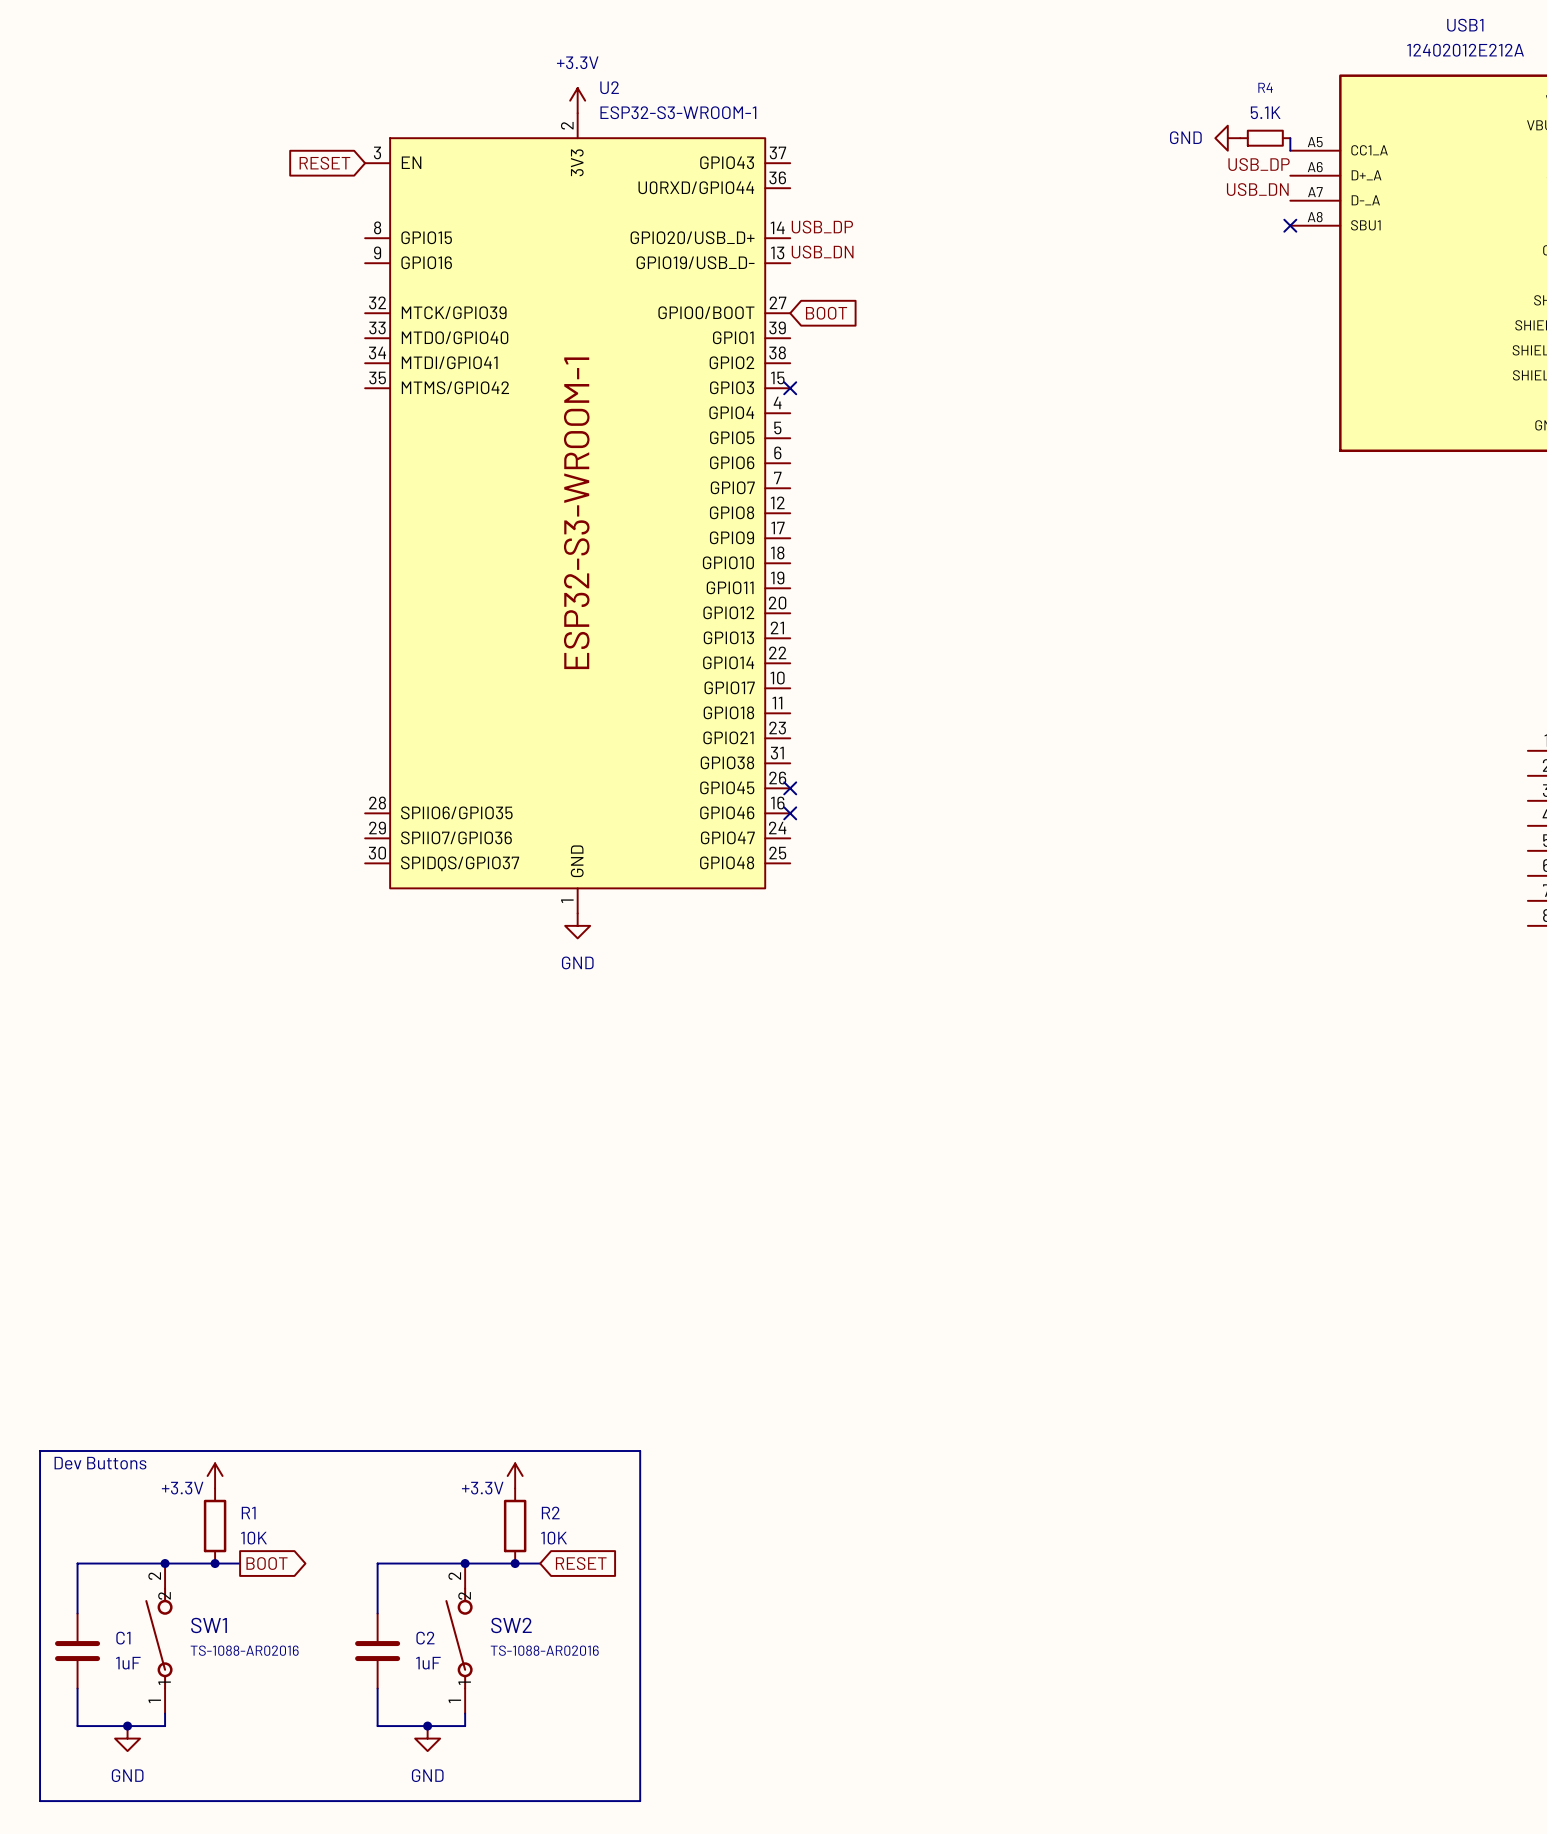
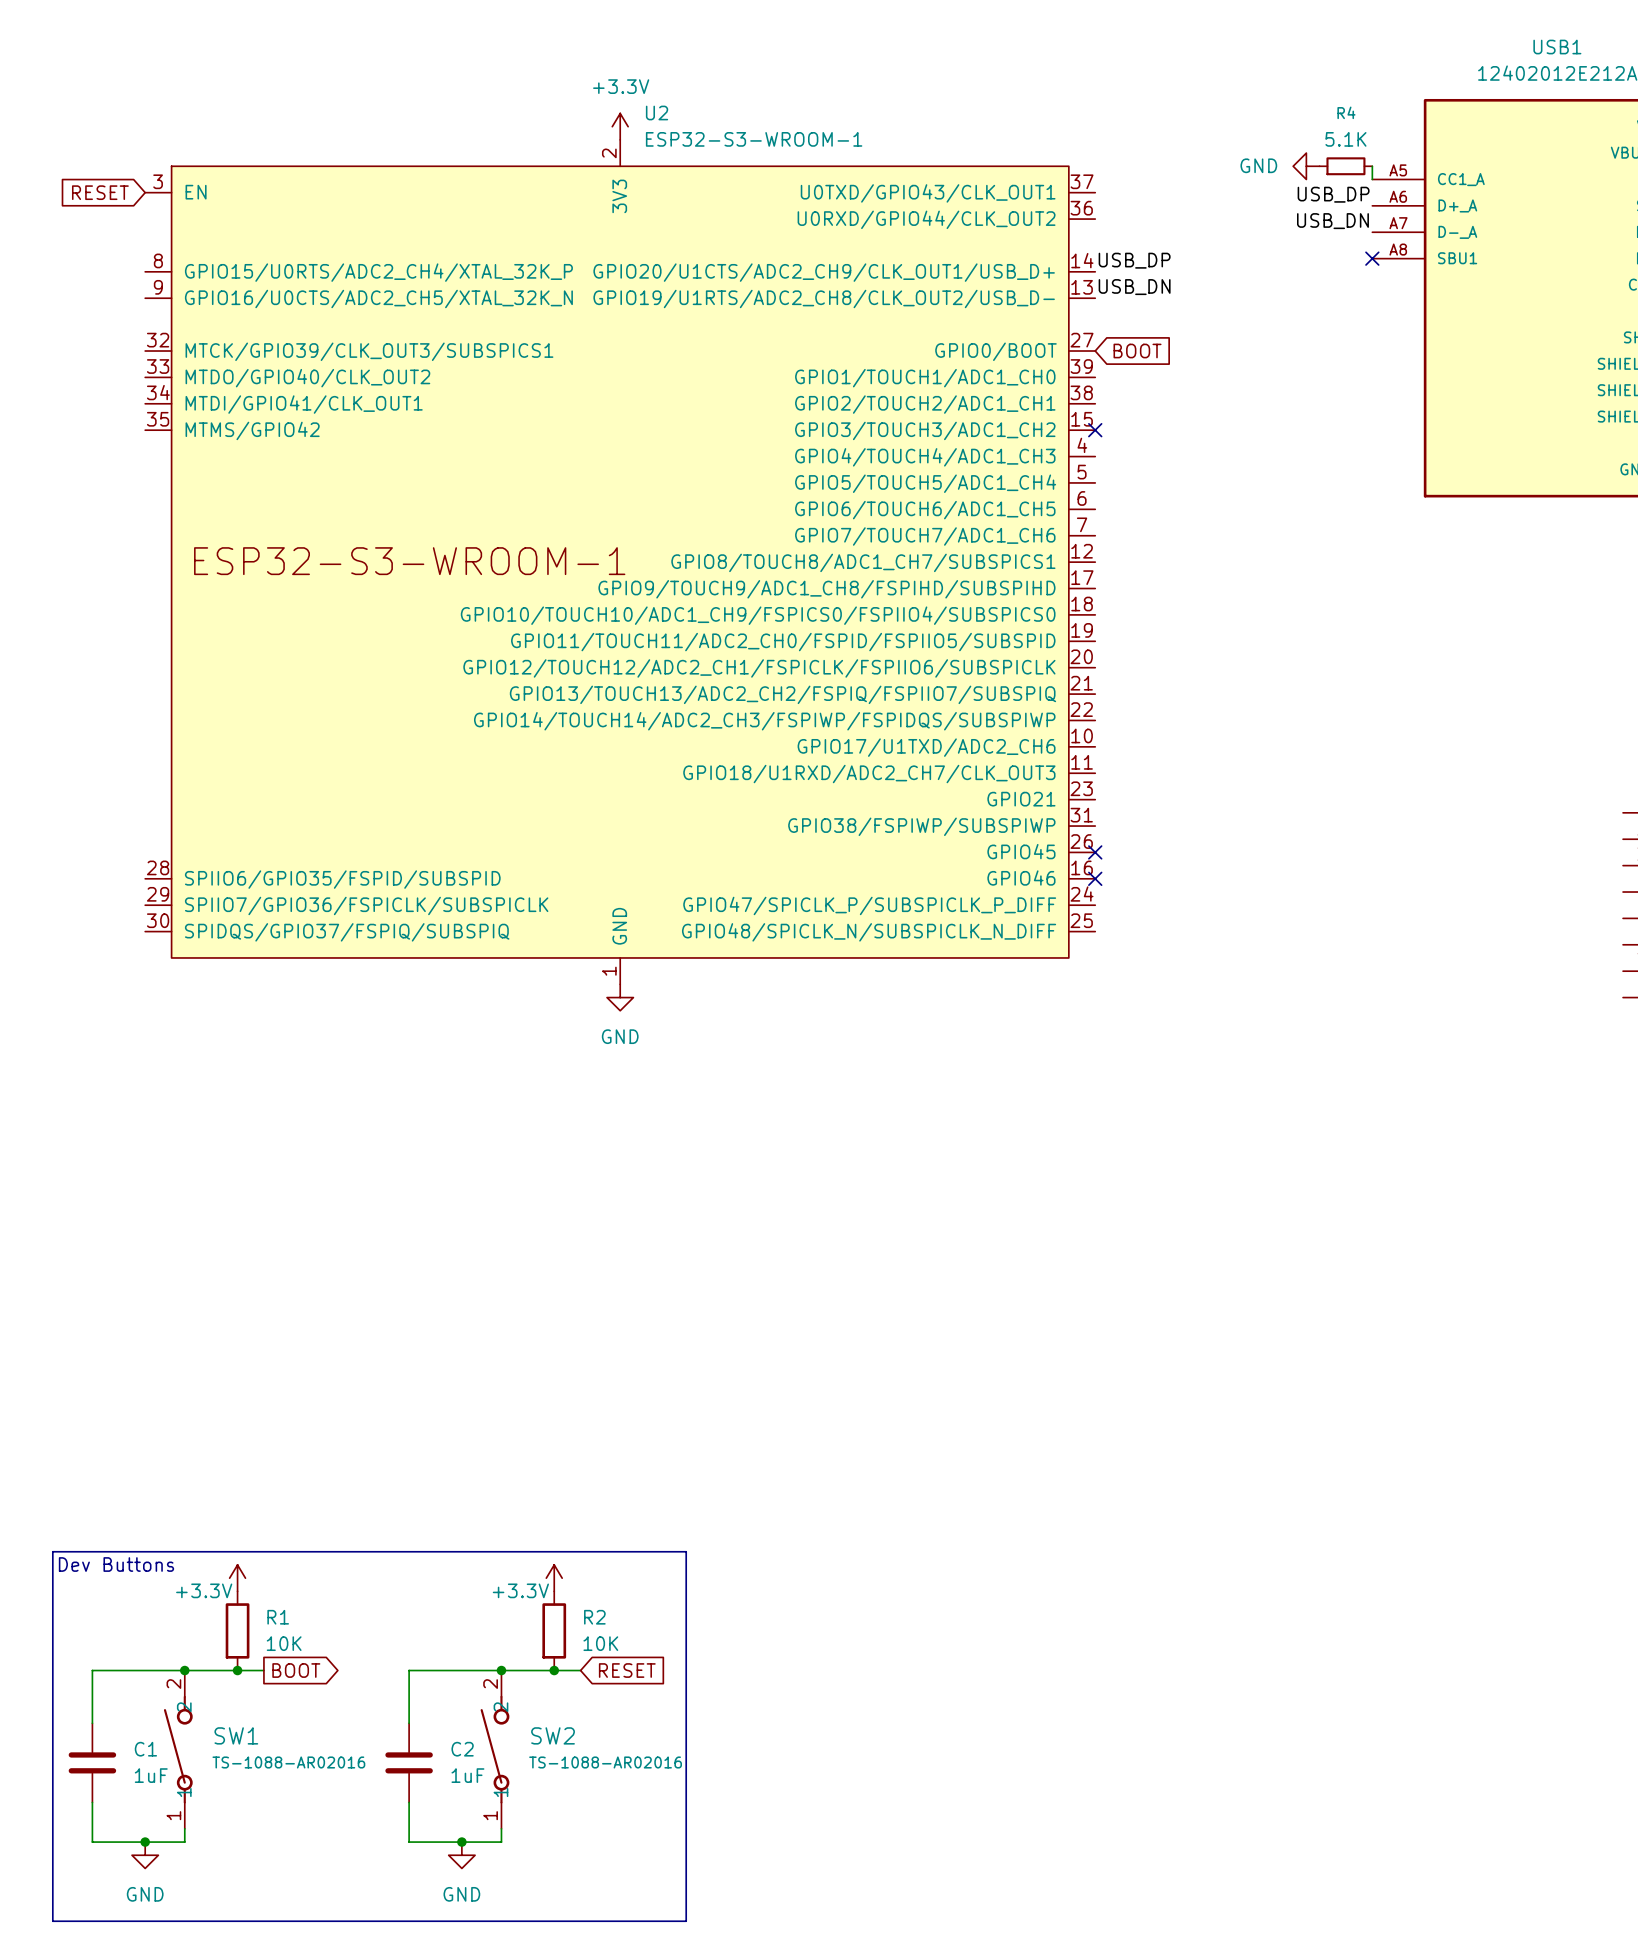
U2 symbol: [365, 113, 791, 914] -> [145, 139, 1096, 985]
global label position: RESET (324, 163) -> RESET (100, 192)
label position: USB_DP (822, 227) -> USB_DP (1134, 260)
label position: USB_DN (822, 252) -> USB_DN (1134, 287)
global label position: BOOT (826, 313) -> BOOT (1137, 351)
no-connect mark: (790, 388) -> none
no-connect mark: none -> (1095, 430)
no-connect mark: (790, 788) -> none
no-connect mark: none -> (1095, 852)
no-connect mark: (790, 813) -> none
no-connect mark: none -> (1095, 878)

